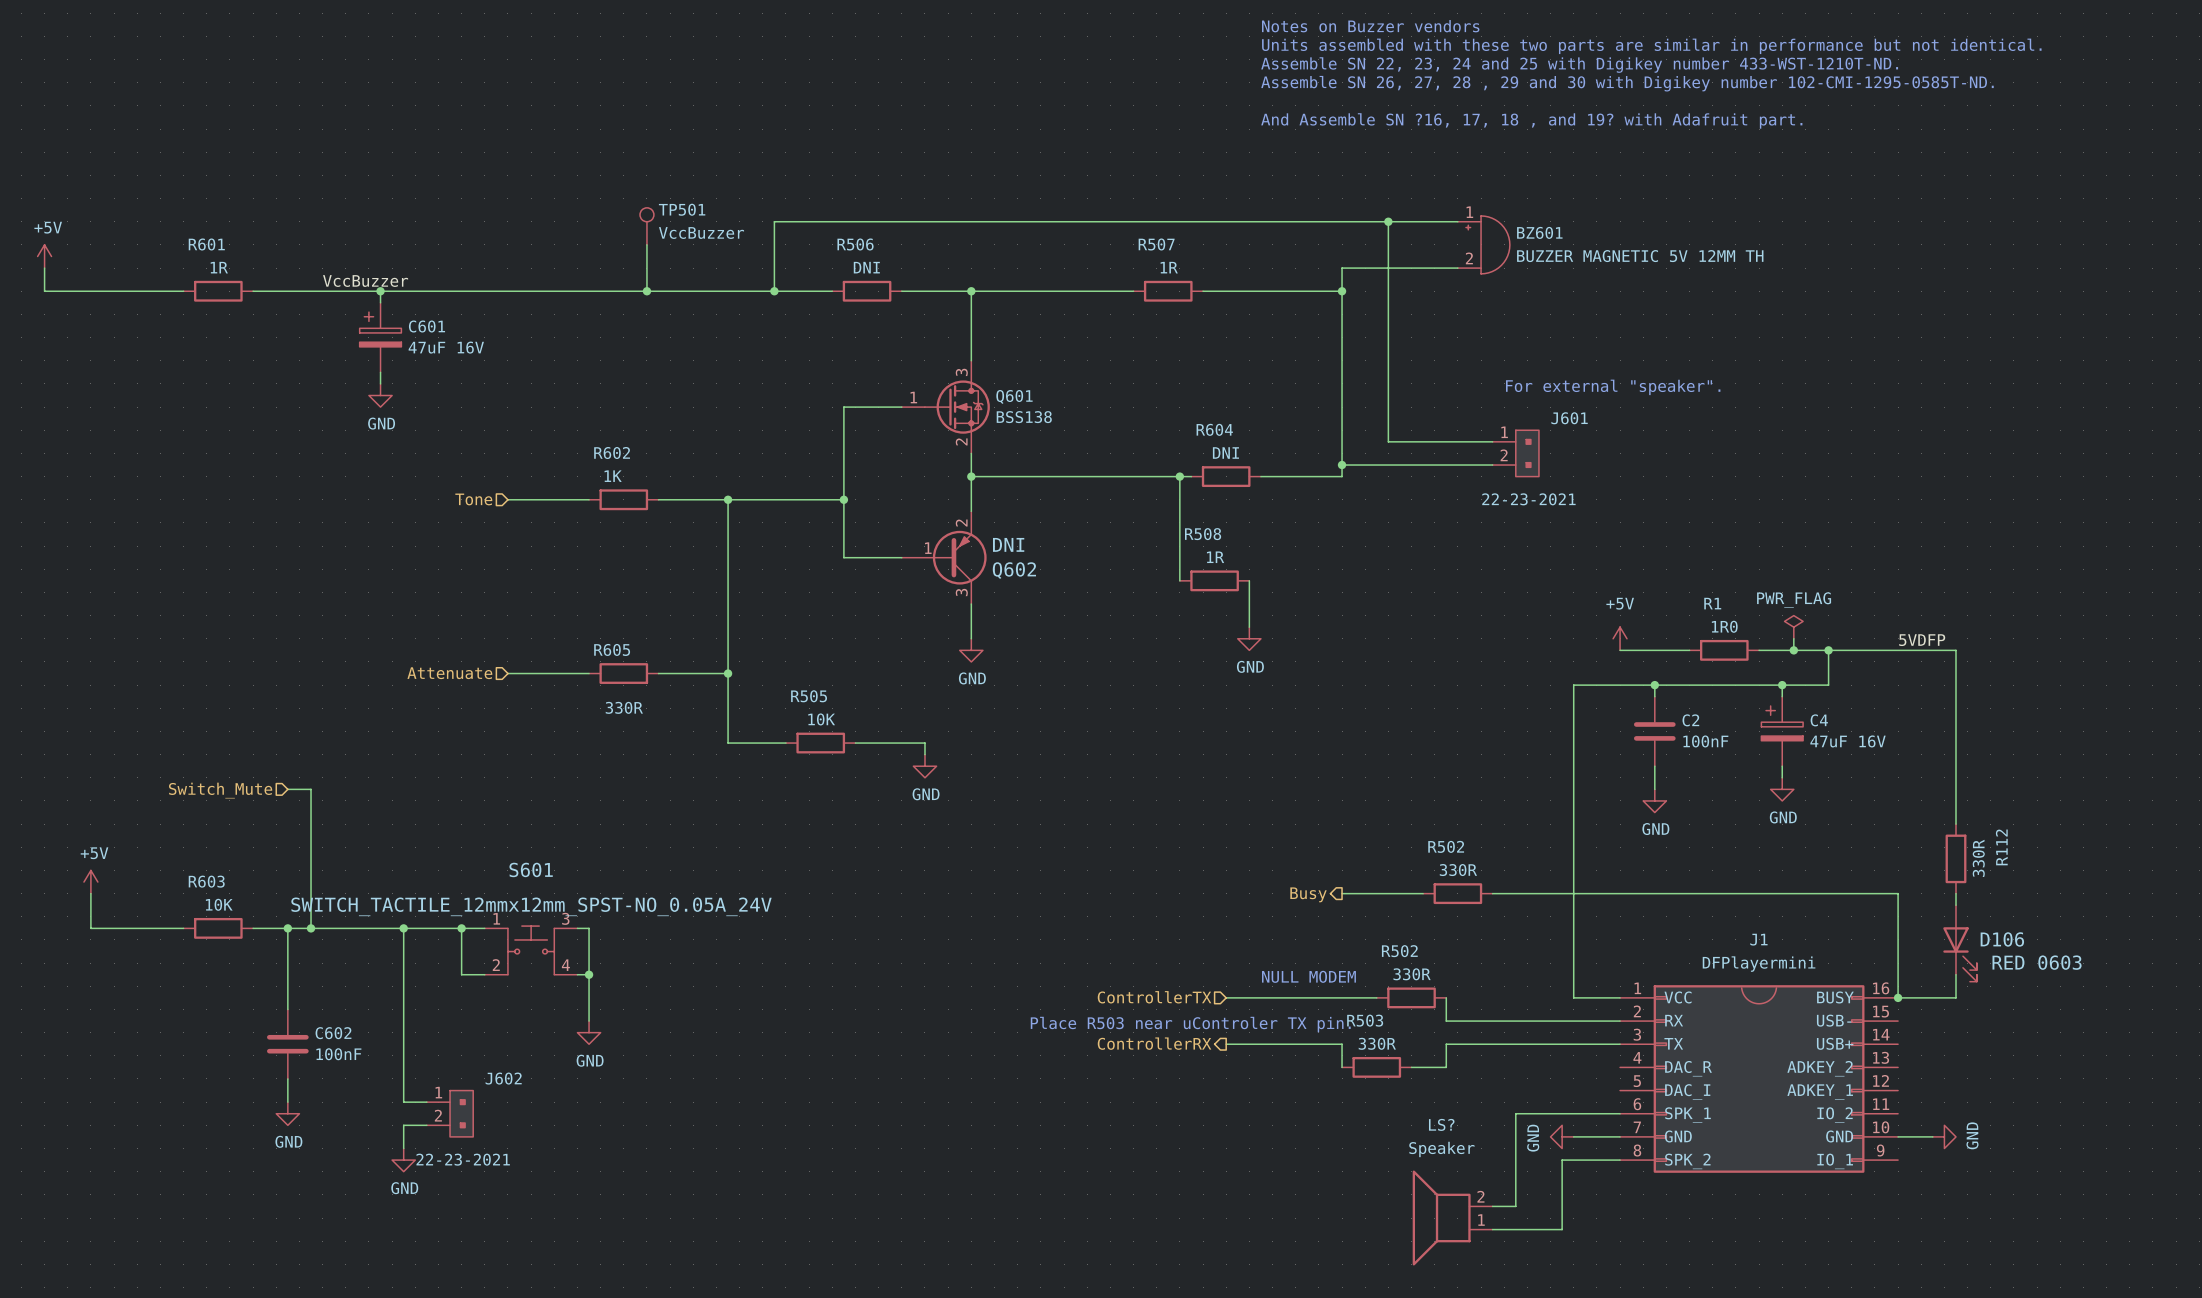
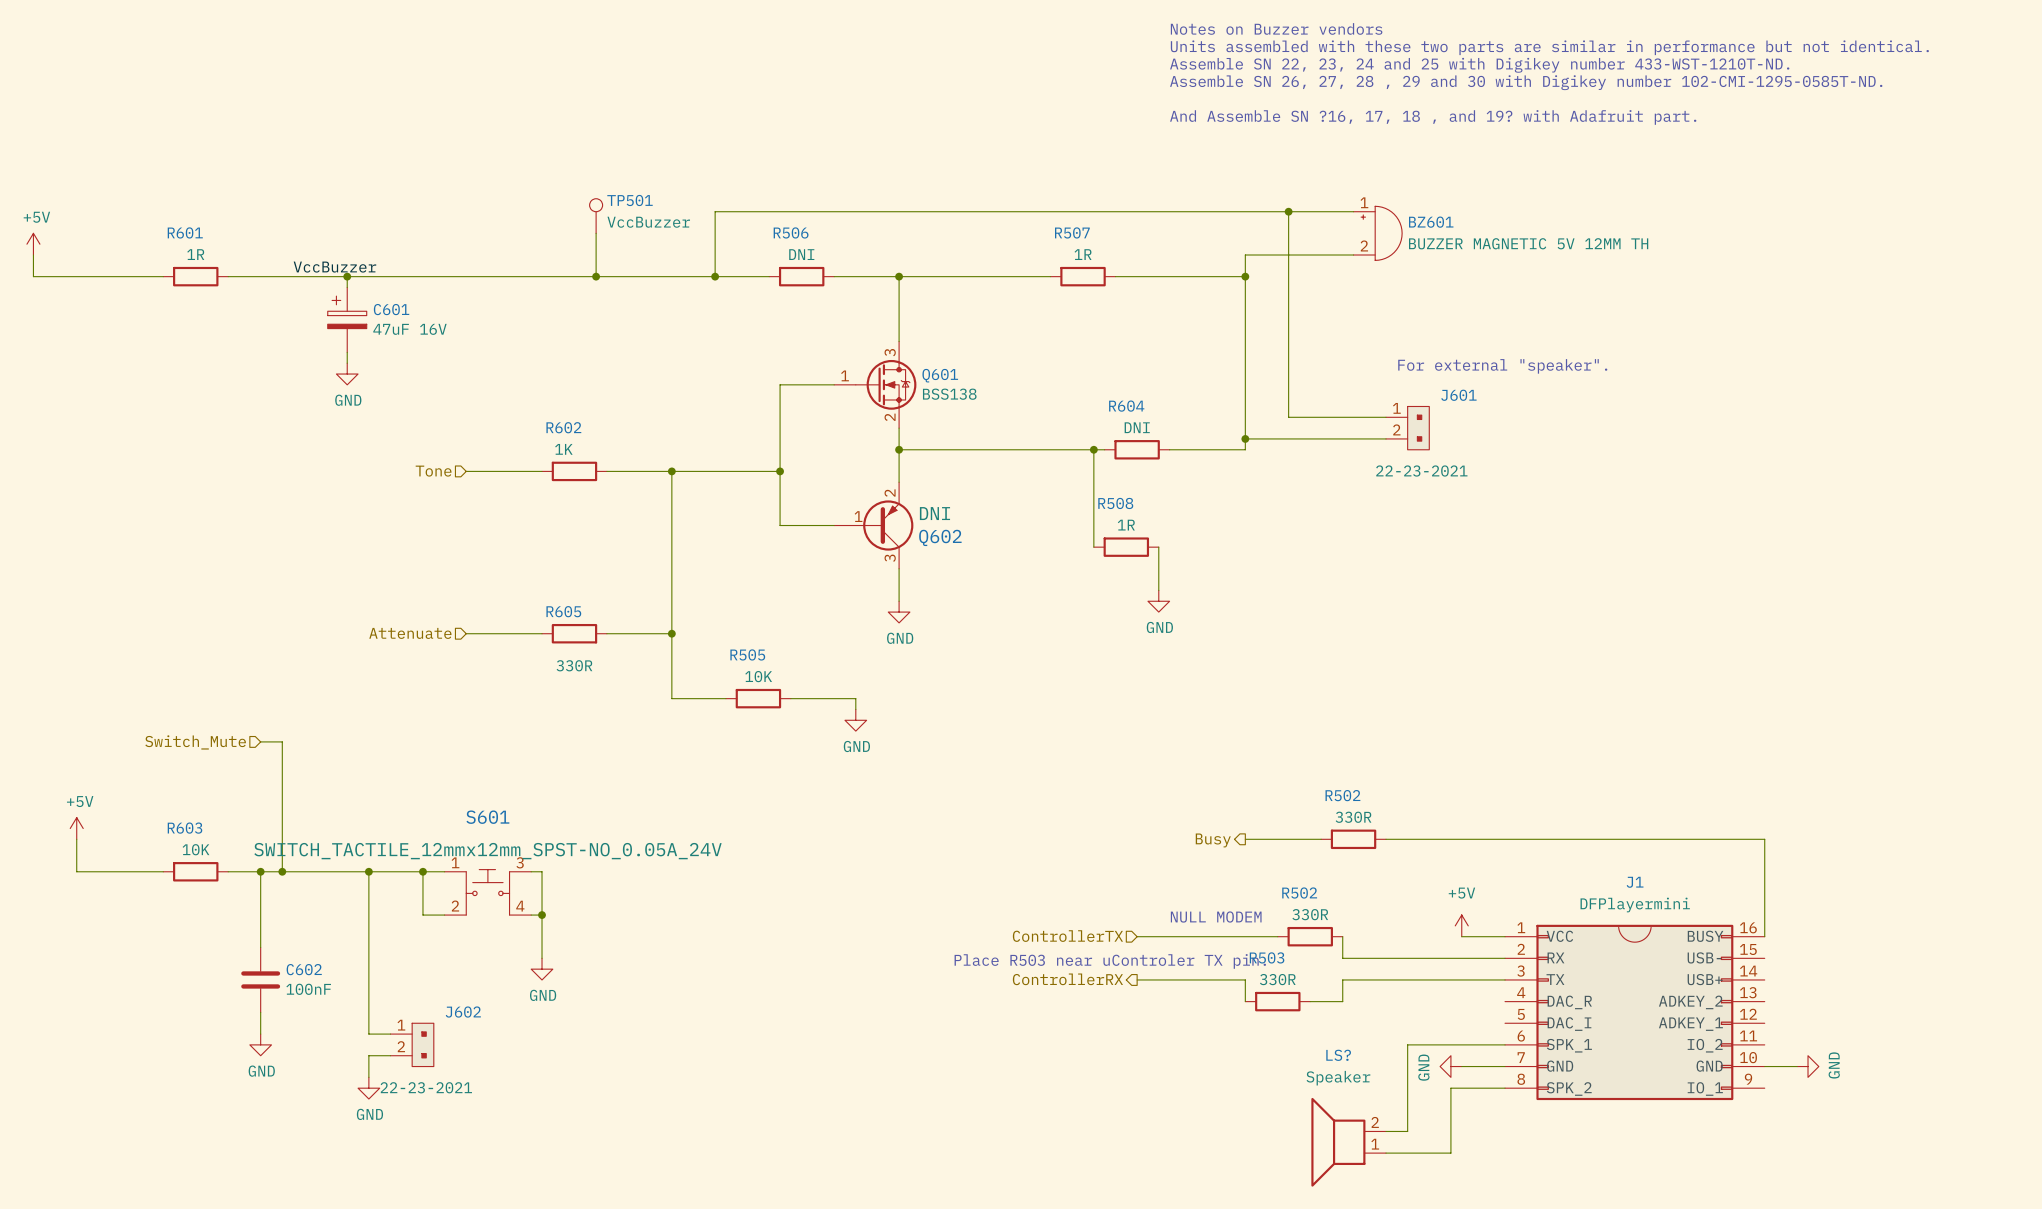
power symbol: PWR_FLAG (1793, 627) -> none
power symbol: +5V (1620, 638) -> none
wire: (1793, 638) (1793, 650) -> none
label: 5VDFP (1922, 640) -> none
wire: (1620, 650) (1689, 650) -> none
R1: 1R0 (1724, 650) -> none
wire: (1759, 650) (1956, 650) (1956, 824) -> none
junction: (1793, 650) -> none
wire: (1828, 650) (1828, 685) (1573, 685) (1573, 997) -> none
junction: (1828, 650) -> none
wire: (1654, 685) (1654, 696) -> none
junction: (1654, 685) -> none
wire: (1782, 685) (1782, 696) -> none
junction: (1782, 685) -> none
C2: 100nF (1654, 731) -> none
C4: 47uF 16V (1782, 731) -> none
wire: (1654, 766) (1654, 789) -> none
wire: (1782, 766) (1782, 777) -> none
power symbol: GND (1782, 789) -> none
power symbol: GND (1654, 800) -> none
R112: 330R (1956, 858) -> none
wire: (1956, 893) (1956, 905) -> none
D106: RED 0603 (1960, 943) -> none
wire: (1956, 974) (1956, 997) (1898, 997) -> none
power symbol: none -> +5V (1461, 925)
junction: (1898, 997) -> none

